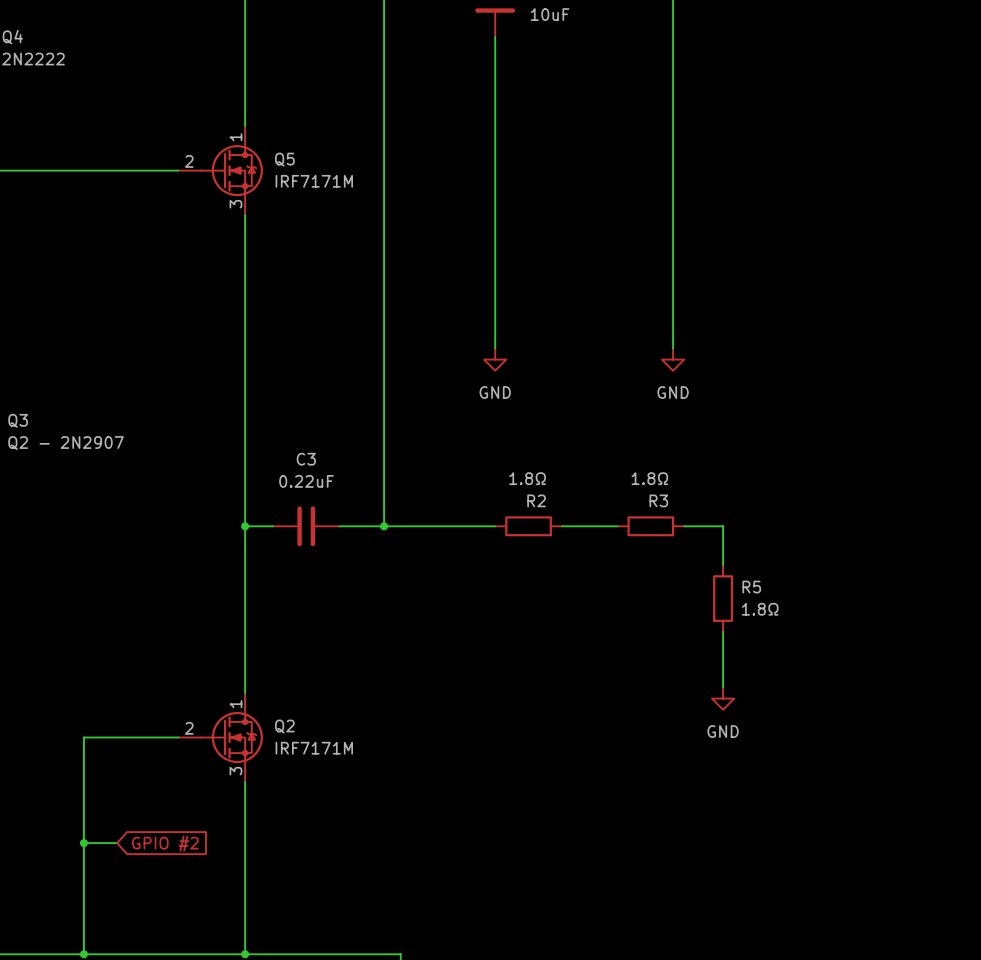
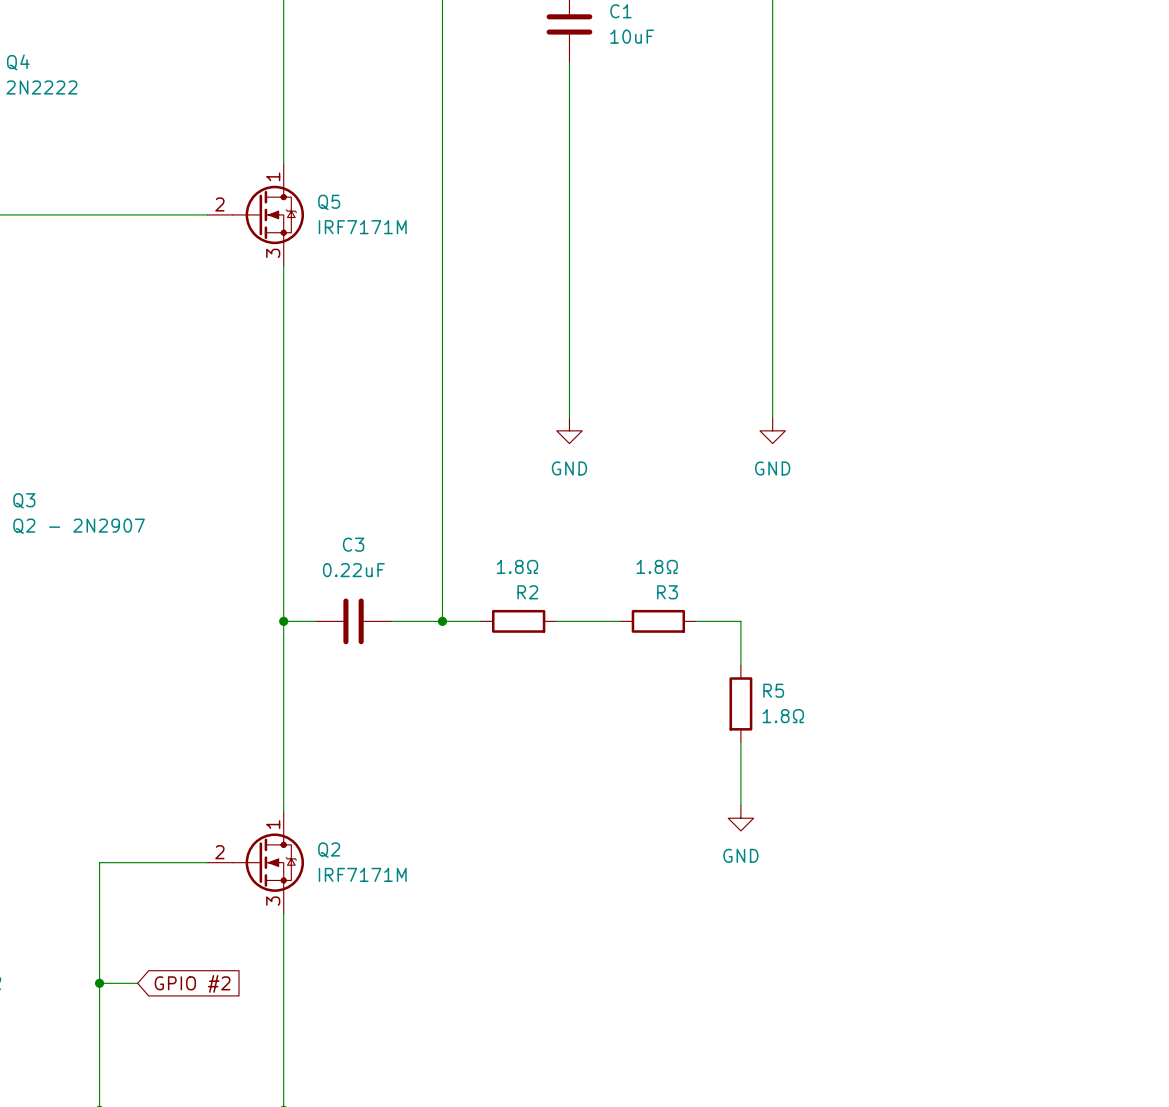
wire: (417, 526) (484, 526) -> none
R2 position: (528, 526) -> (518, 621)
wire: (561, 526) (606, 526) -> (569, 621) (620, 621)
wire: none -> (709, 621) (740, 621) (740, 665)
R3 position: (650, 526) -> (658, 621)
wire: (684, 526) (723, 526) (723, 565) -> none
R5 position: (723, 598) -> (740, 703)
wire: (723, 631) (723, 687) -> (740, 742) (740, 805)
power symbol position: GND (723, 698) -> GND (740, 818)

